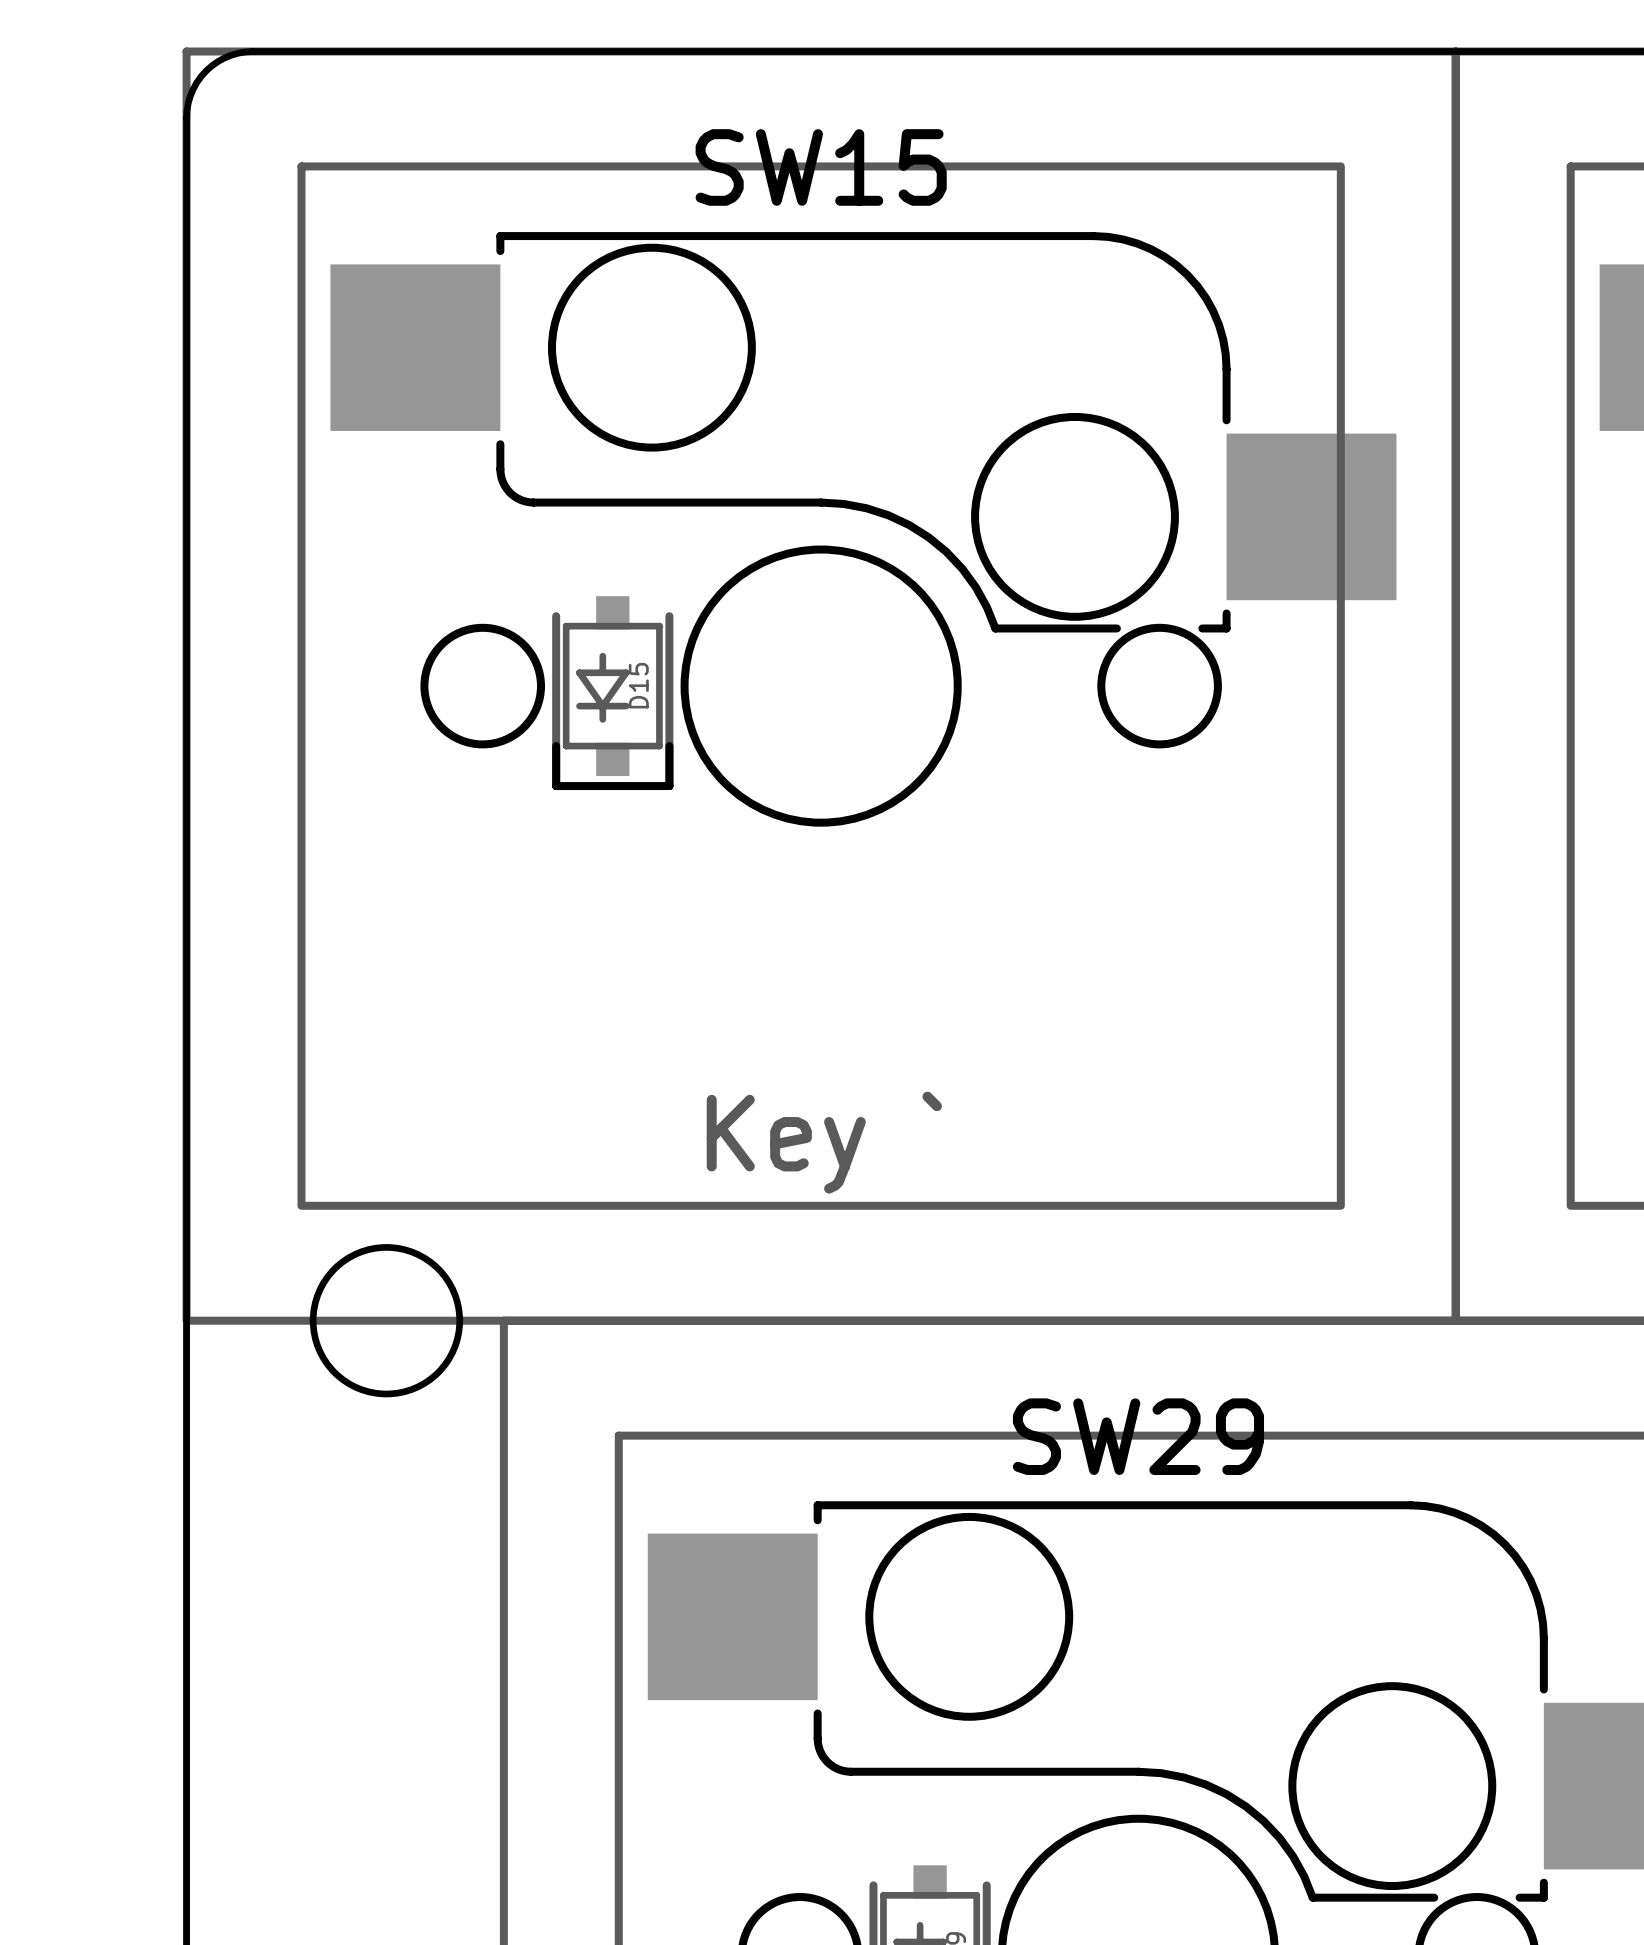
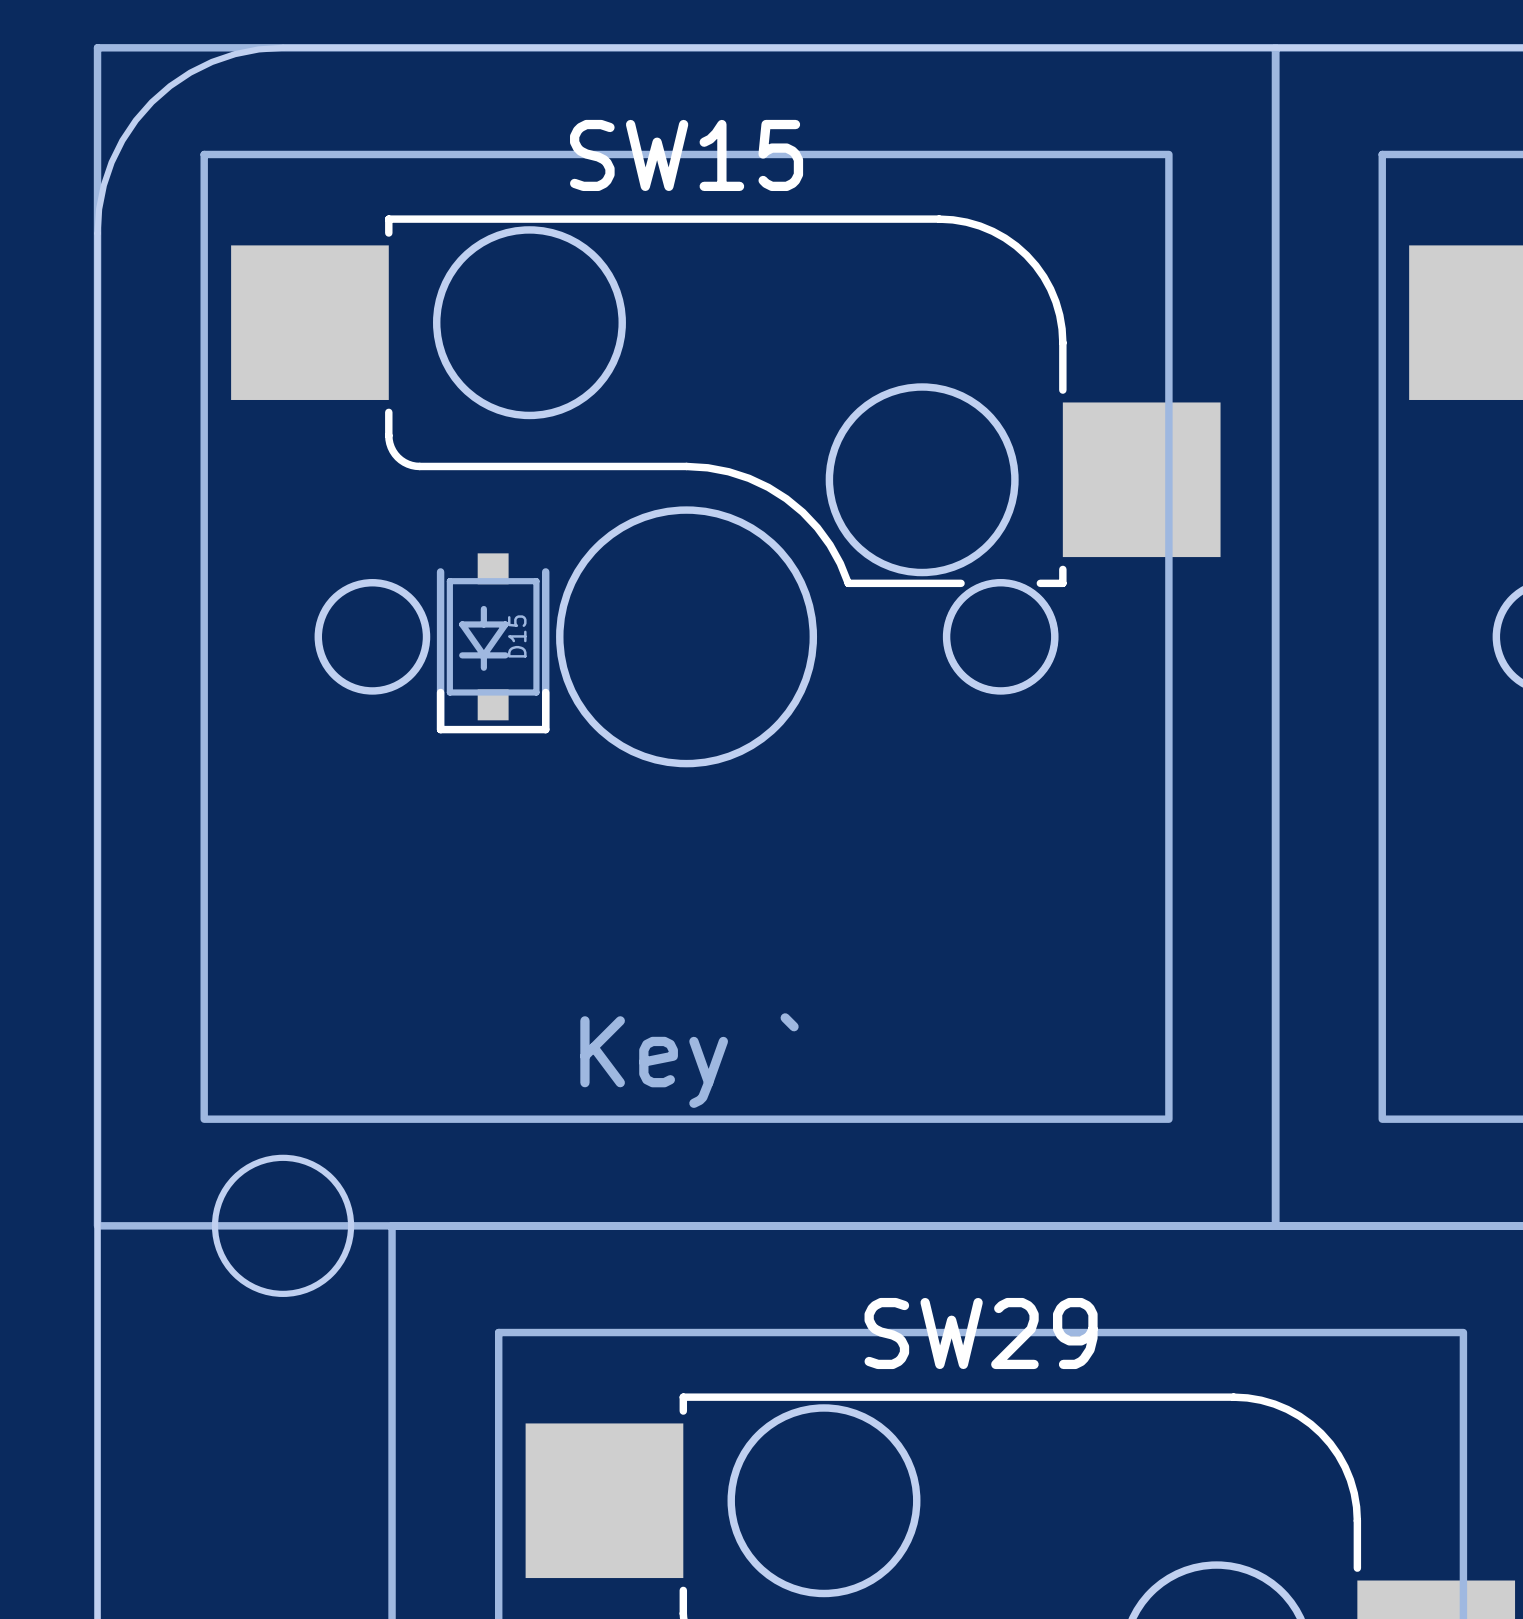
board edge: (386, 51) (245, 51) (224, 58) (206, 71) (193, 89) (186, 110) (186, 251) -> (283, 47) (258, 49) (235, 54) (212, 61) (190, 72) (170, 86) (151, 102) (135, 120) (122, 140) (111, 162) (103, 185) (99, 209) (97, 233)

